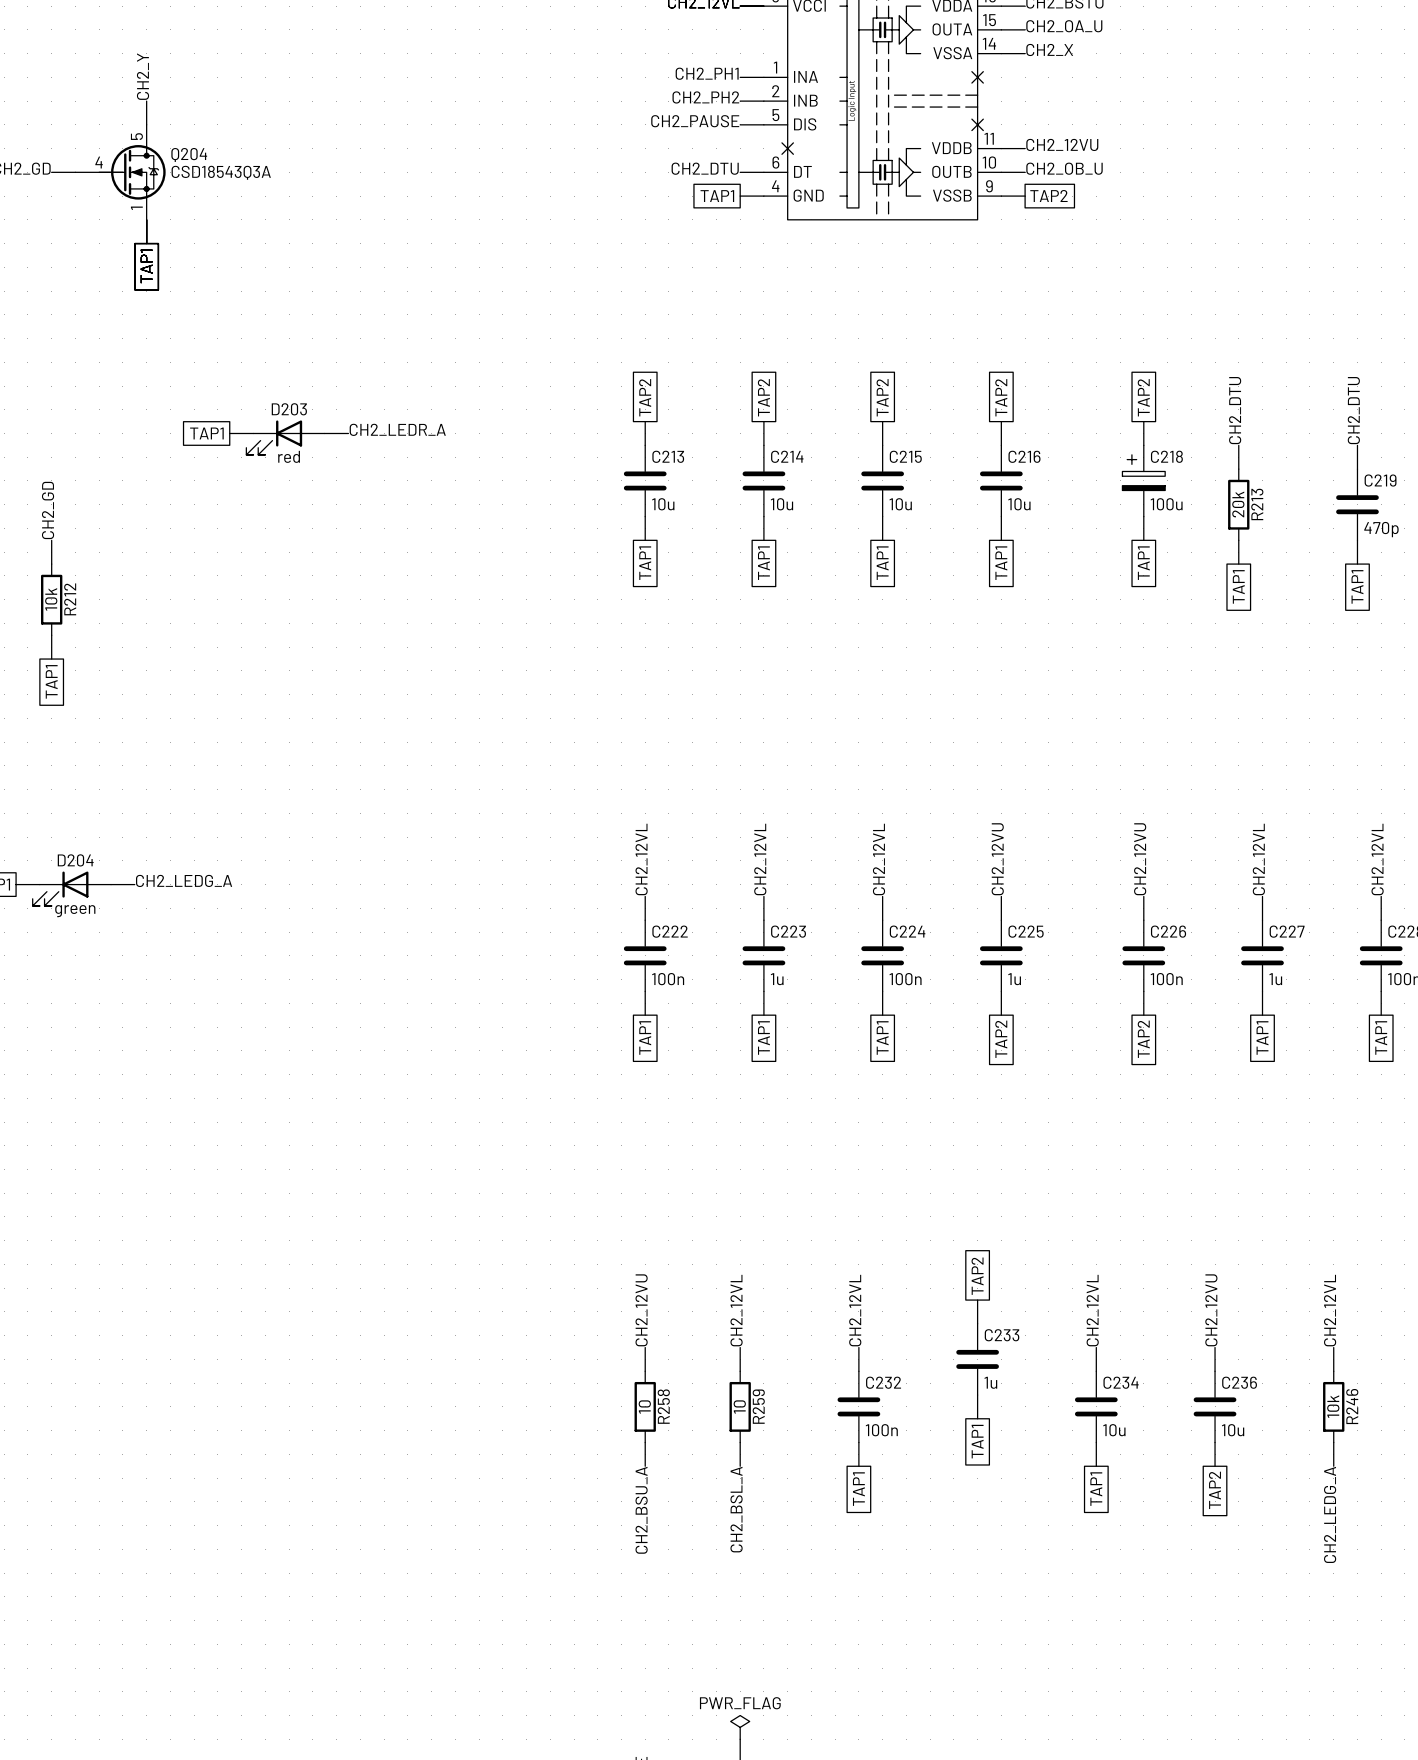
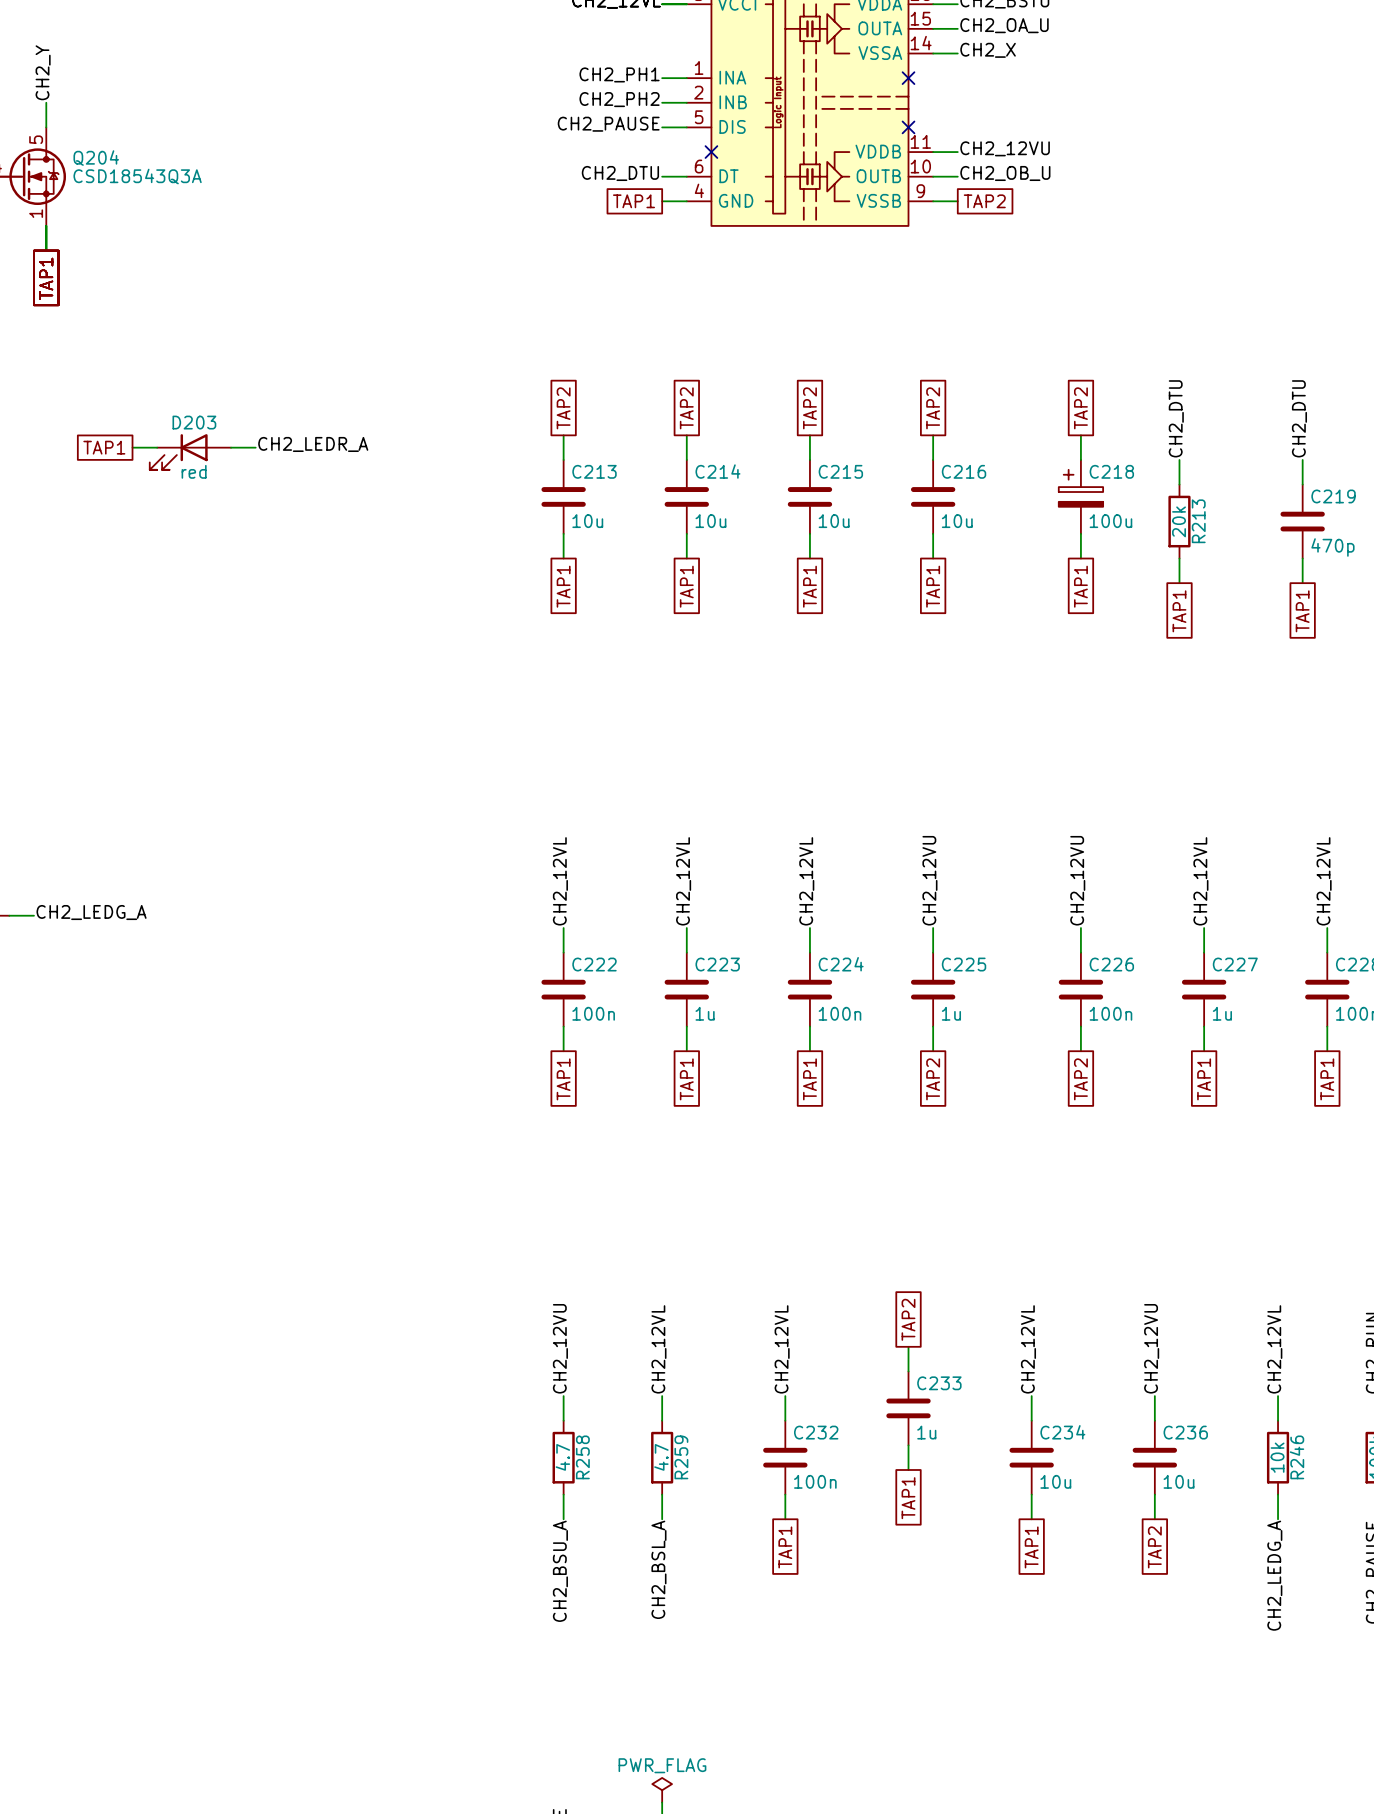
R258 value: 10 (644, 1407) -> 4.7 (562, 1457)
R259 value: 10 (739, 1407) -> 4.7 (661, 1457)

